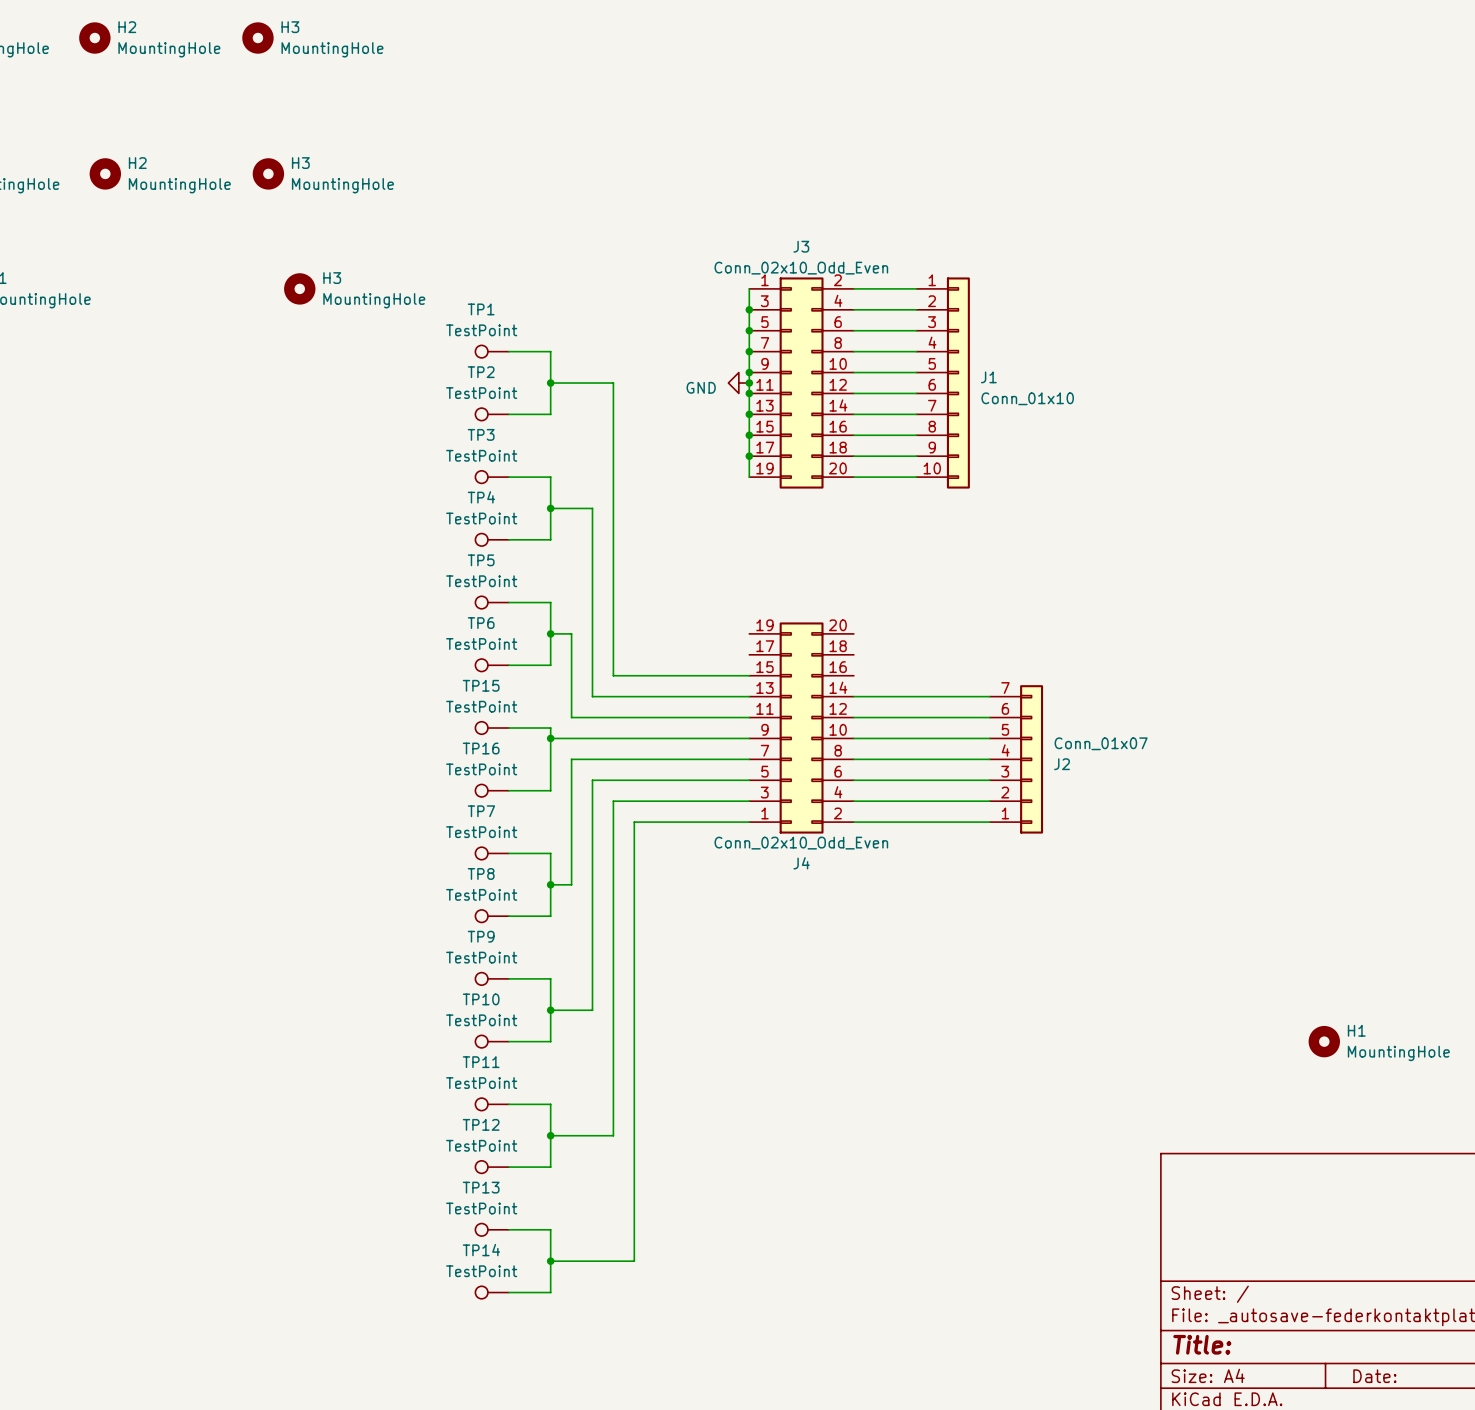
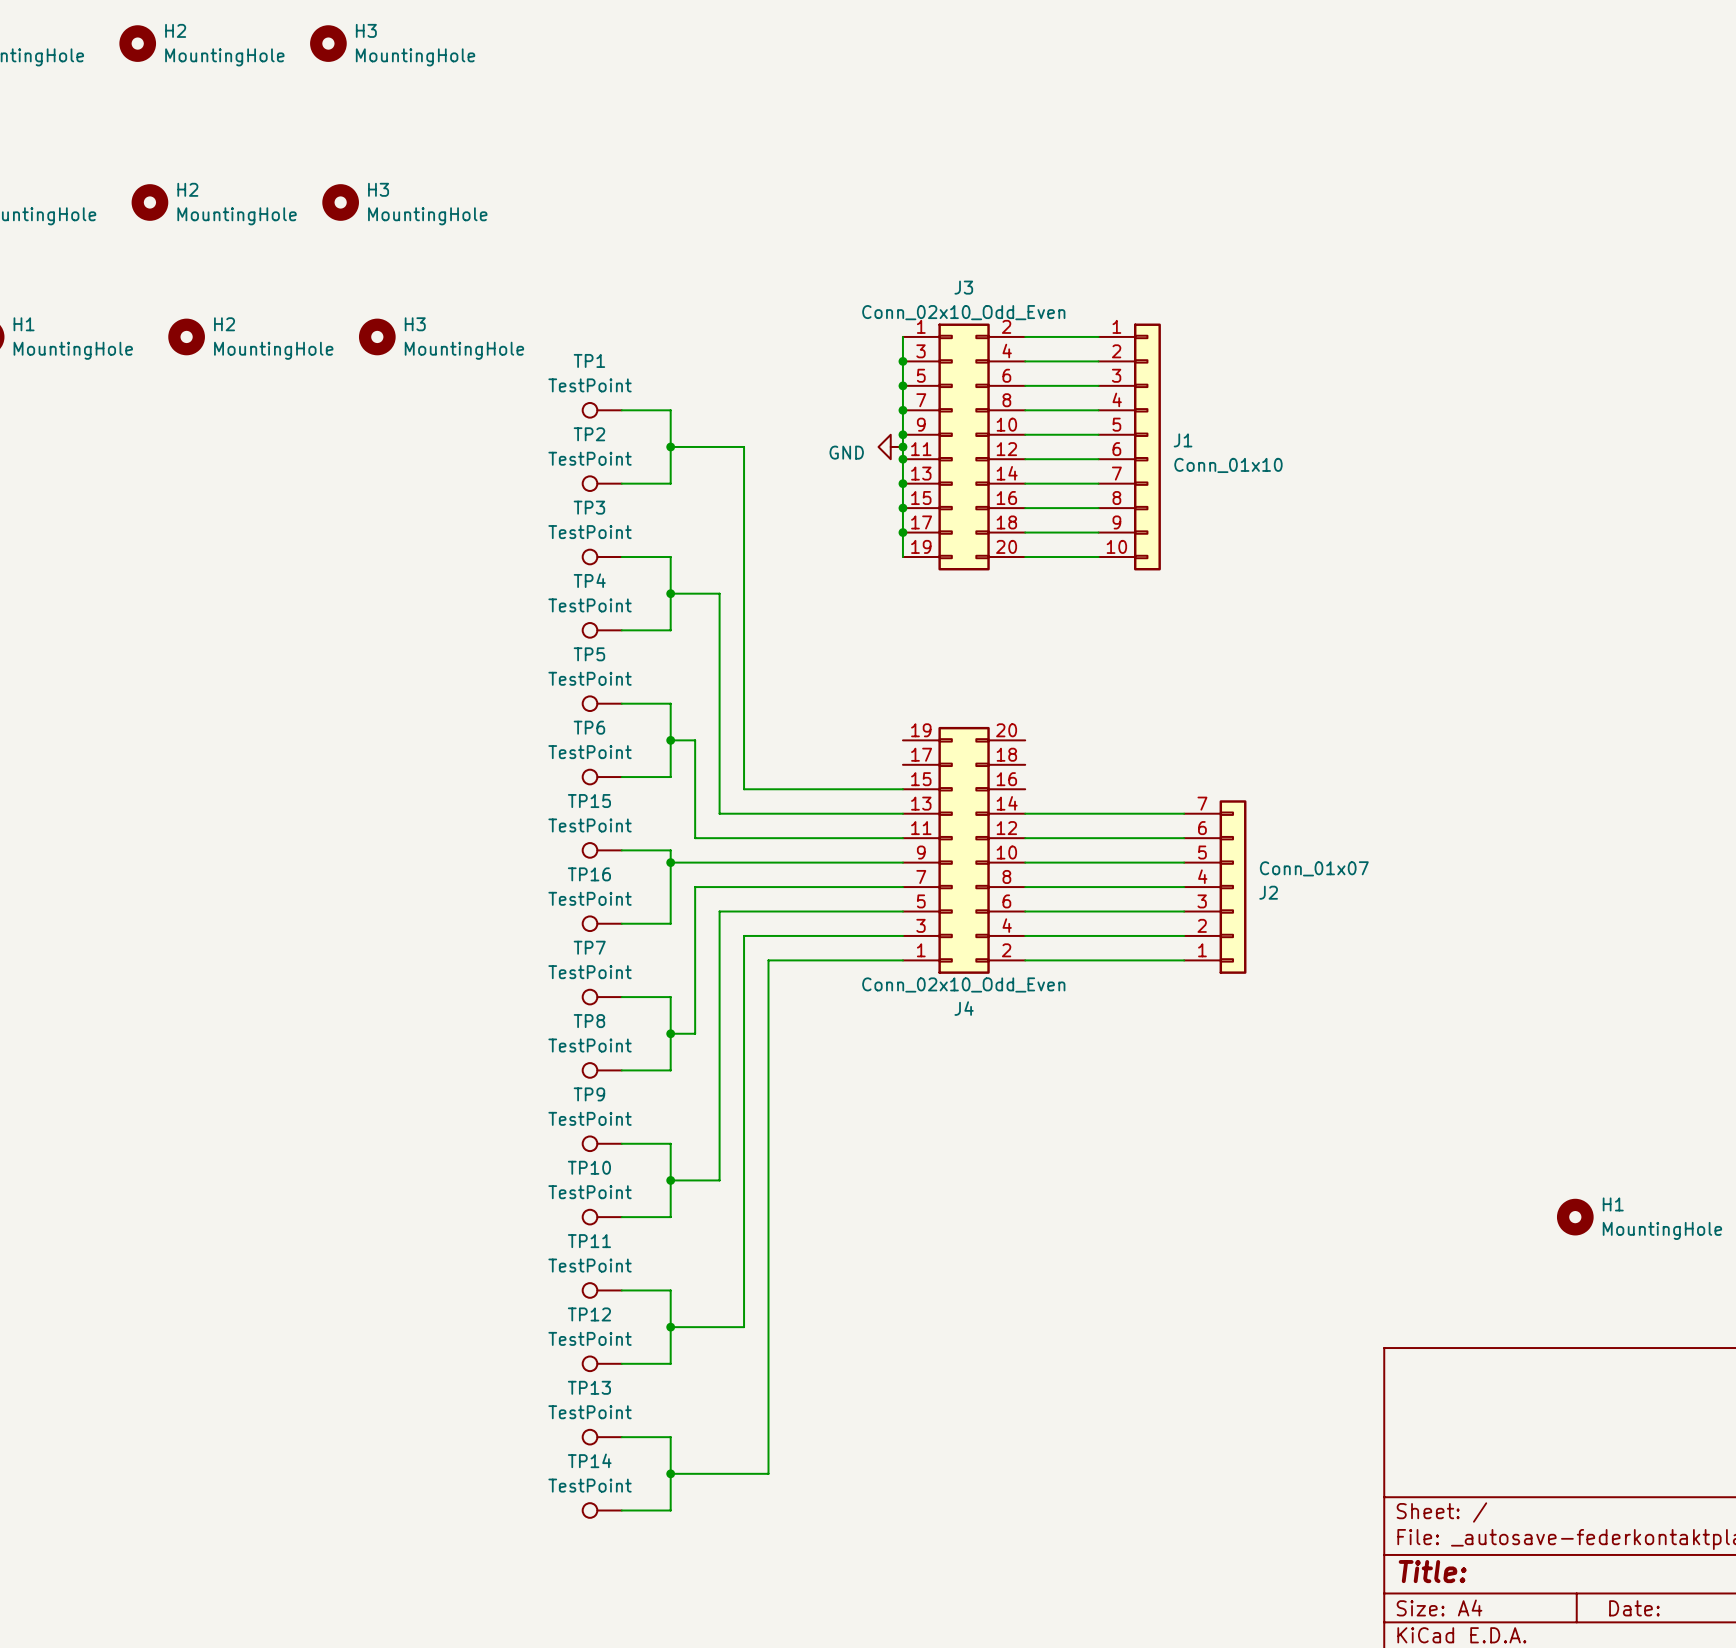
H2: none -> MountingHole (186, 336)

